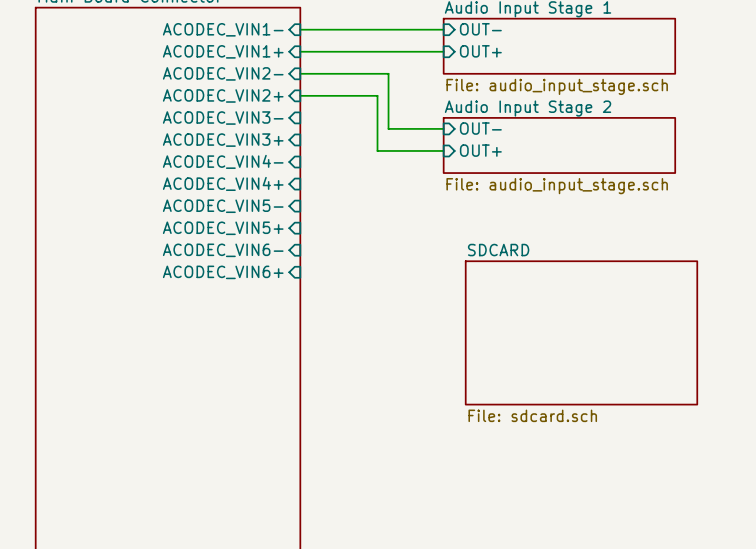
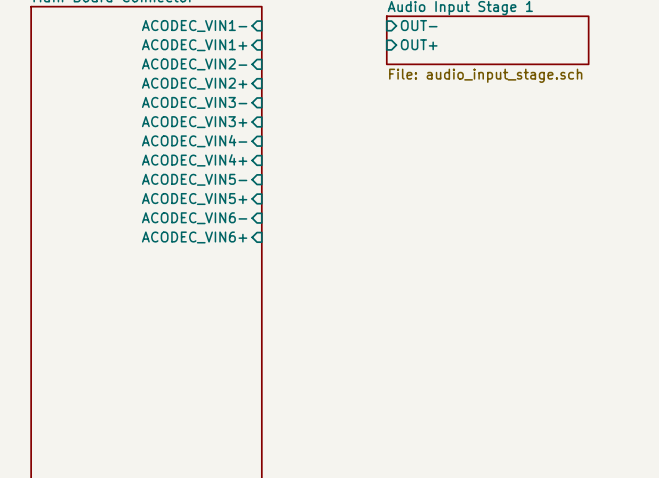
wire: (300, 29) (443, 29) -> none
wire: (300, 51) (443, 51) -> none
wire: (300, 73) (388, 73) (388, 128) (443, 128) -> none
wire: (300, 95) (377, 95) (377, 150) (443, 150) -> none
sheet pin: OUT- (480, 128) -> none
sheet Audio Input Stage 2: File: audio_input_stage.sch (559, 145) -> none
sheet pin: OUT+ (480, 150) -> none
sheet SDCARD: File: sdcard.sch (581, 332) -> none

